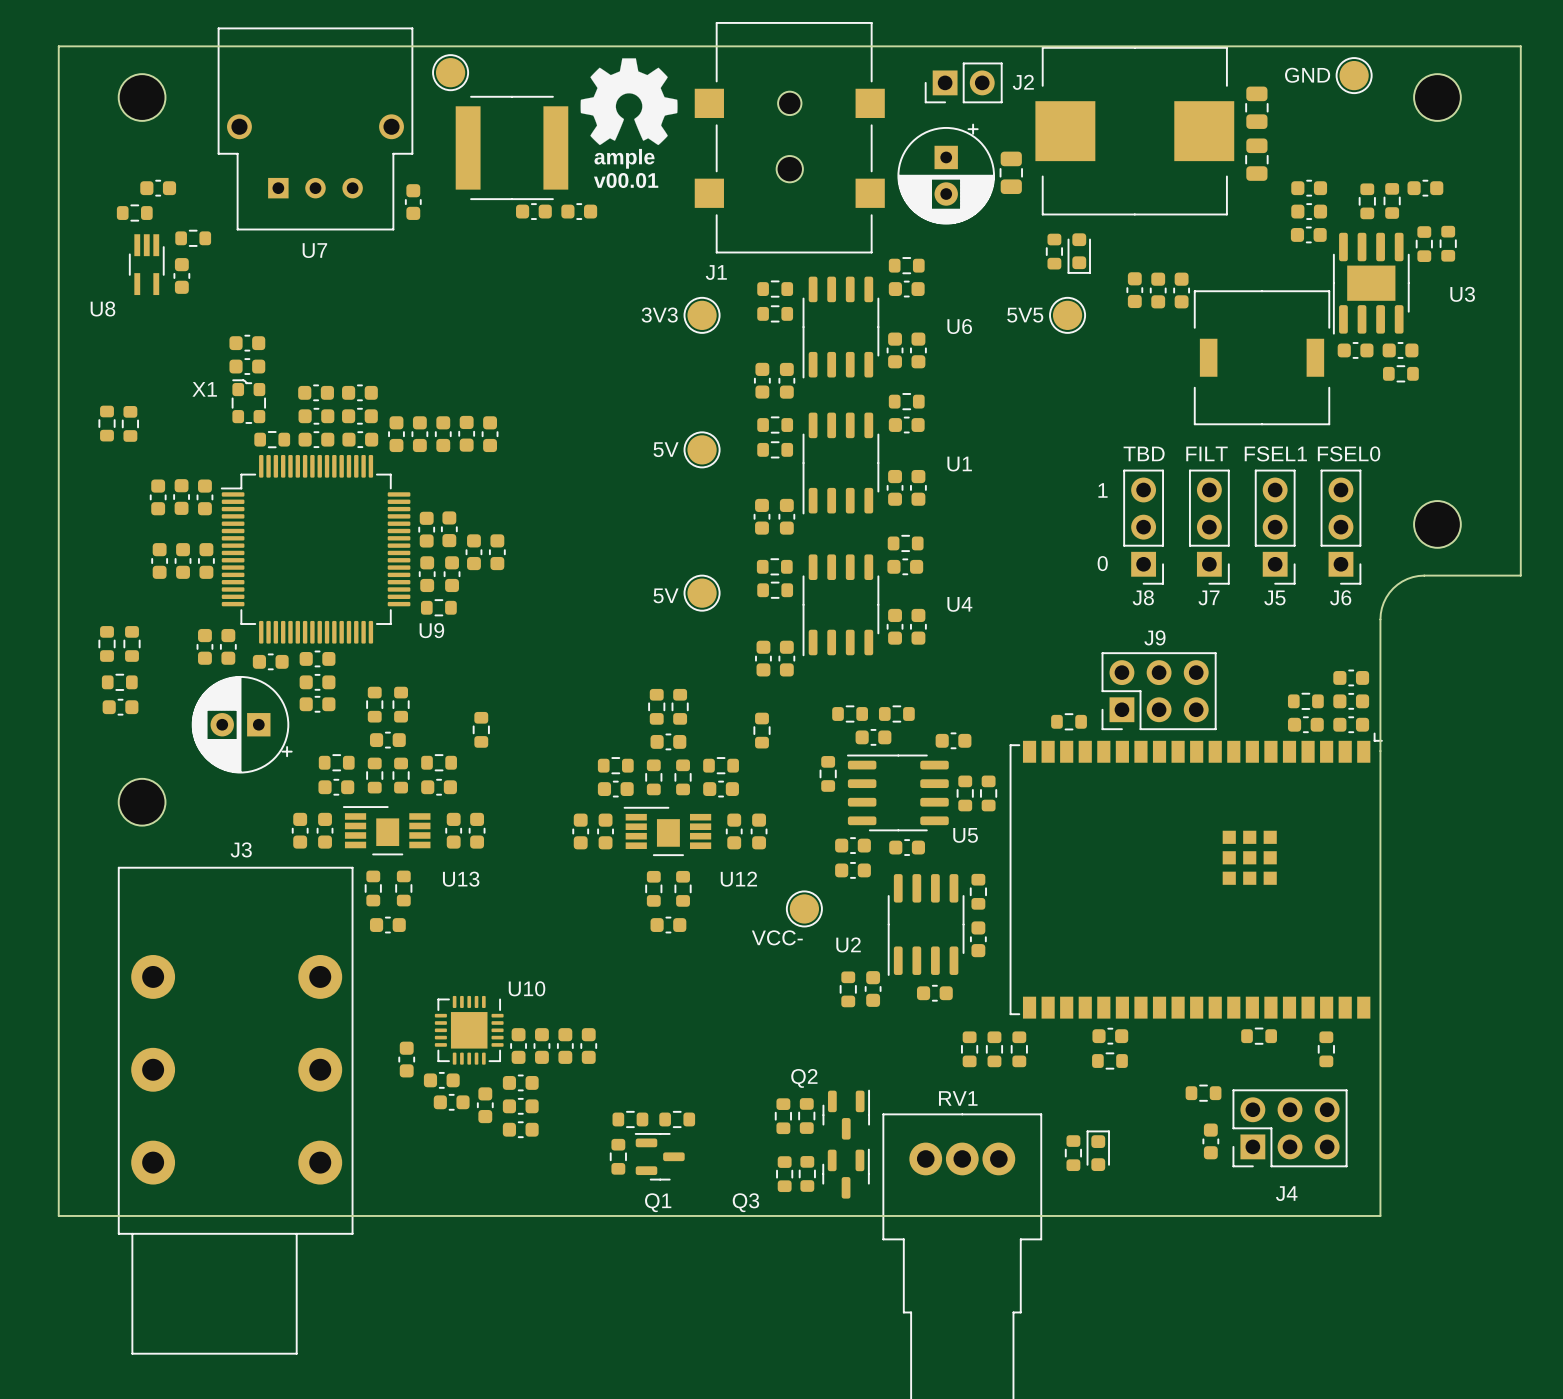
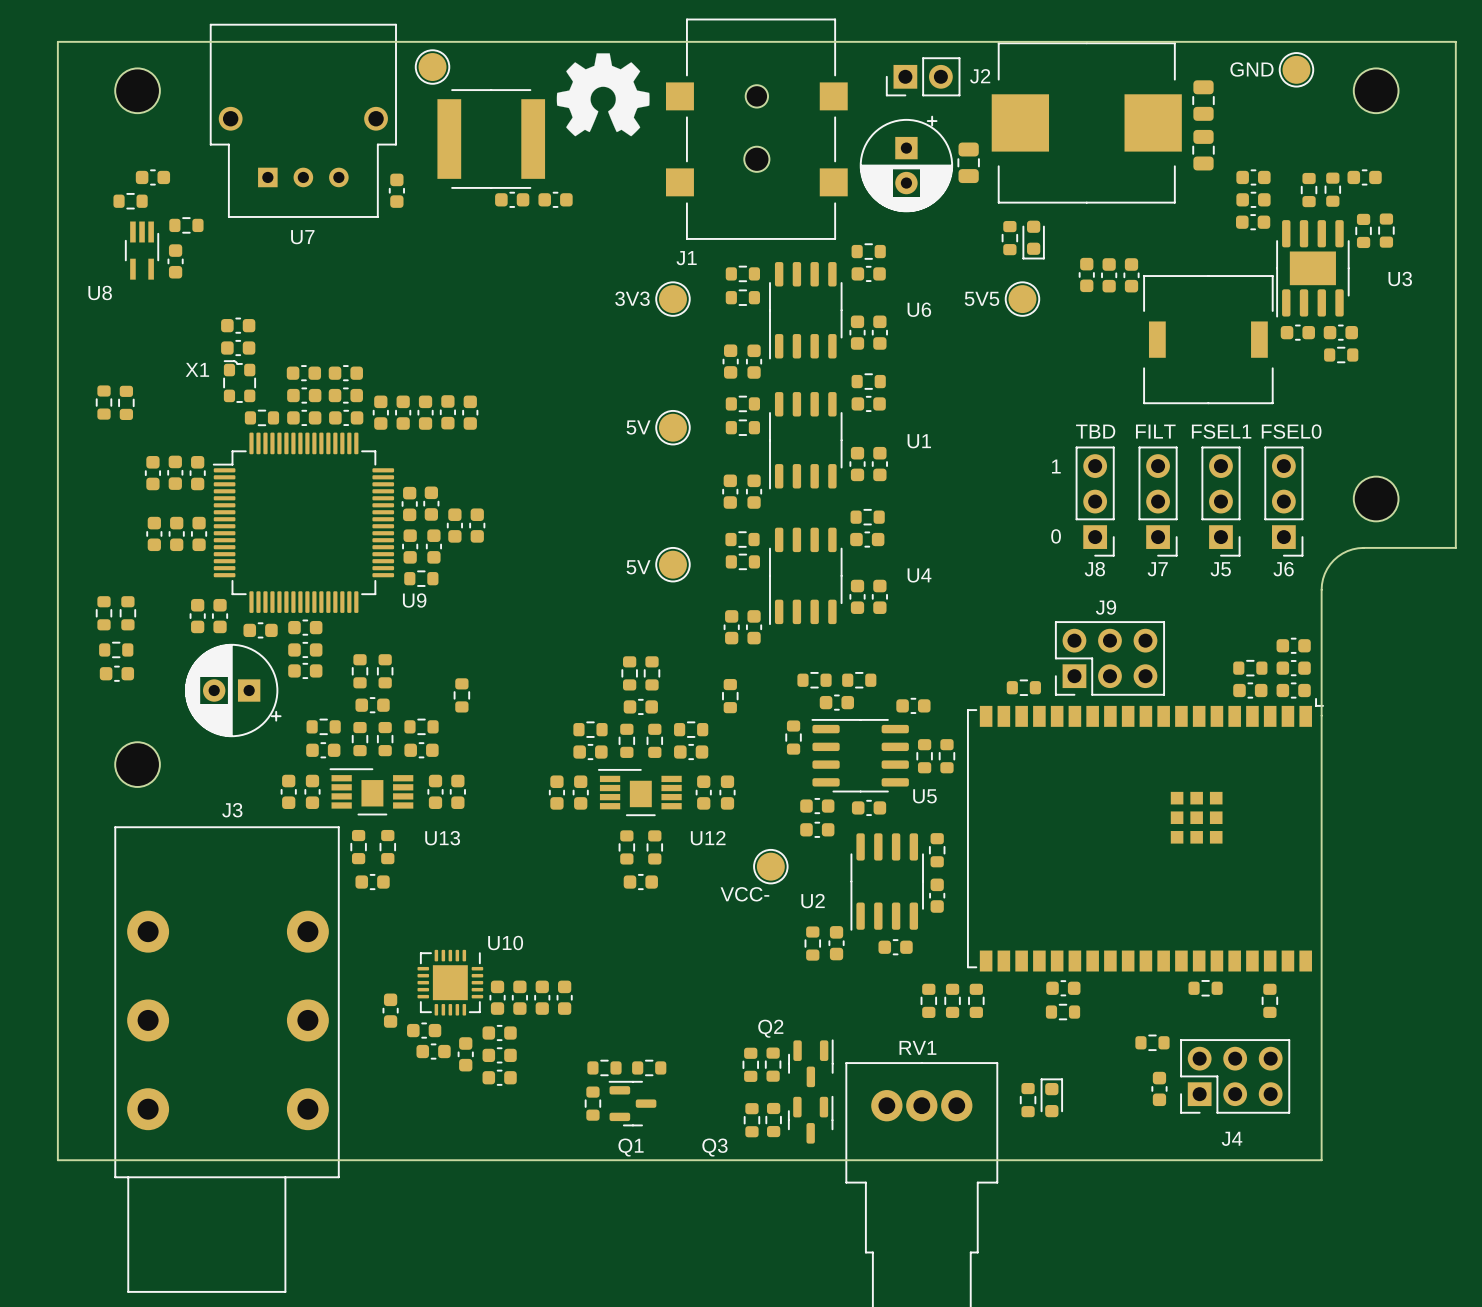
text: ample (624, 158) -> none
text: v00.01 (626, 180) -> none

